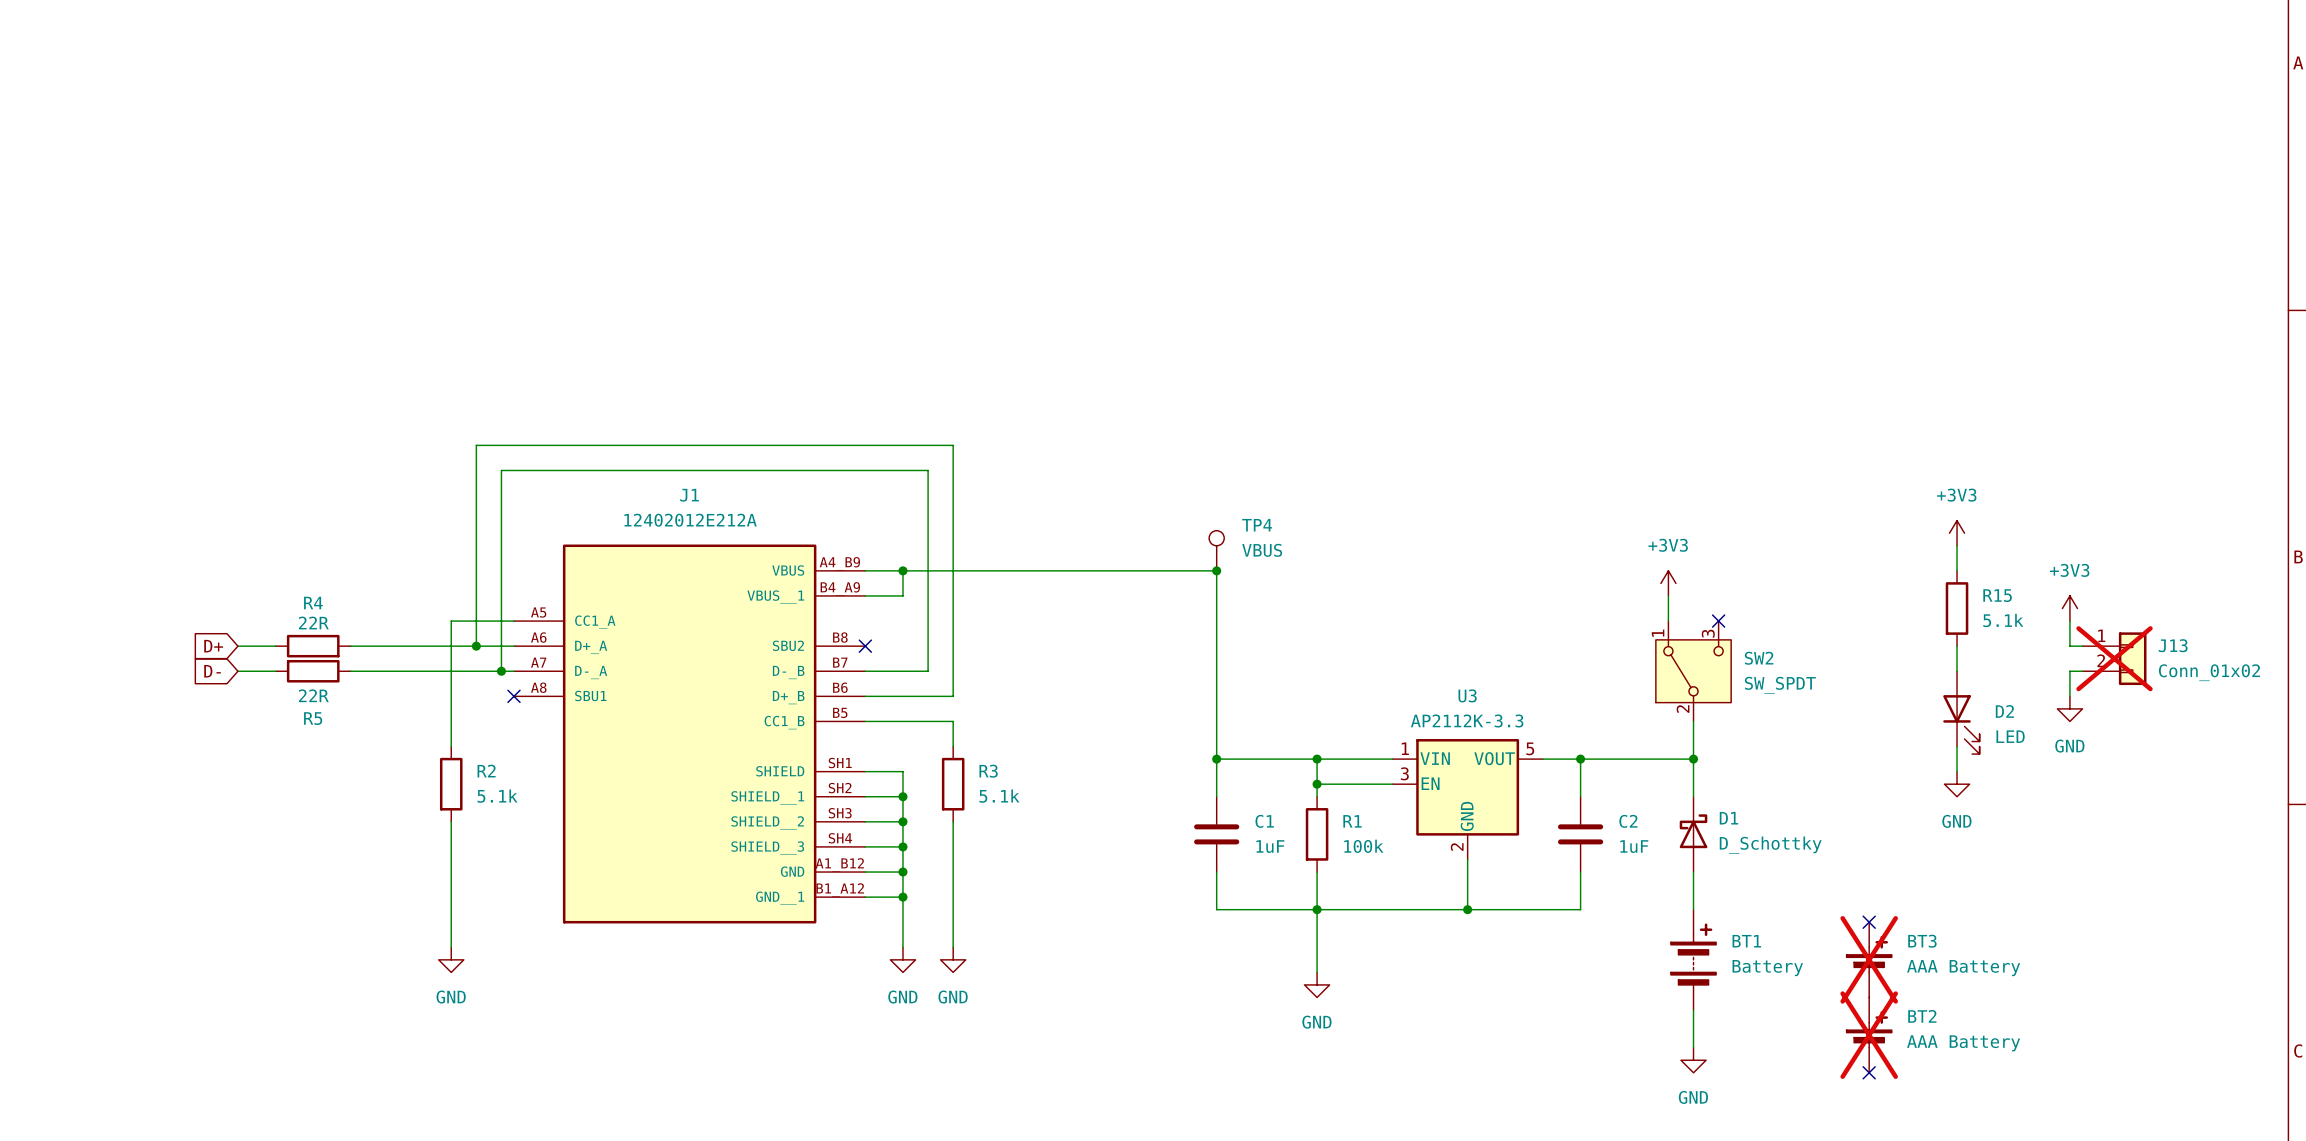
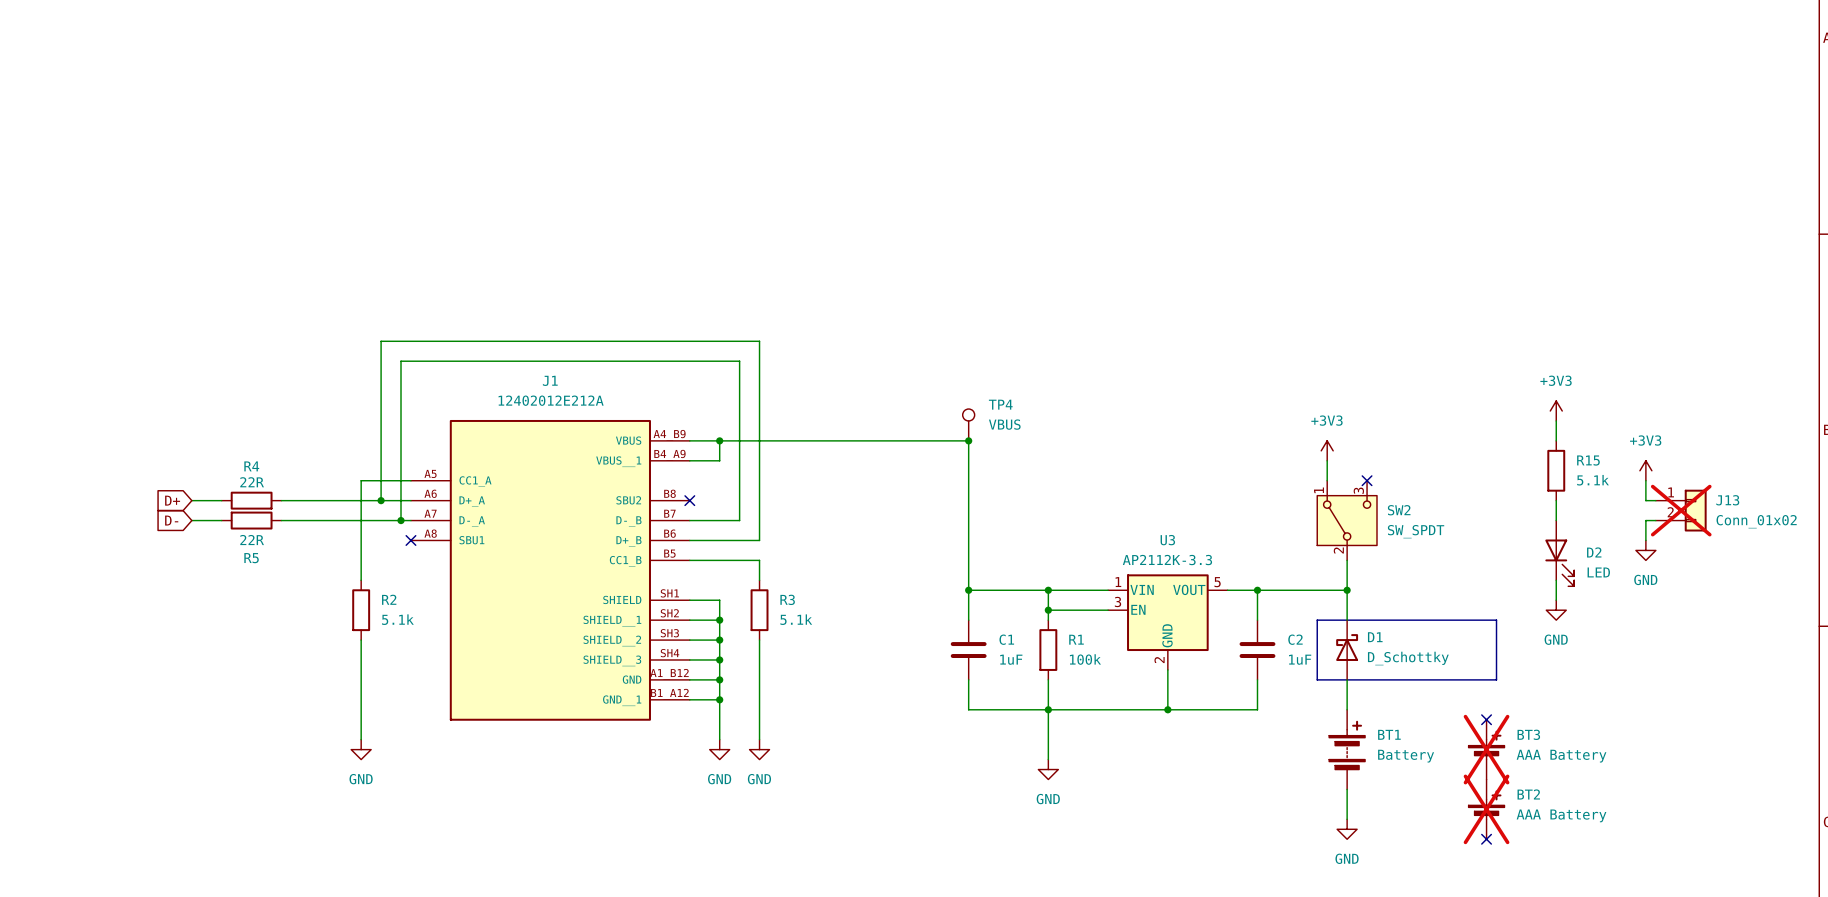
line: none -> (1317, 620) (1496, 620) (1496, 679) (1317, 679) (1317, 620)

